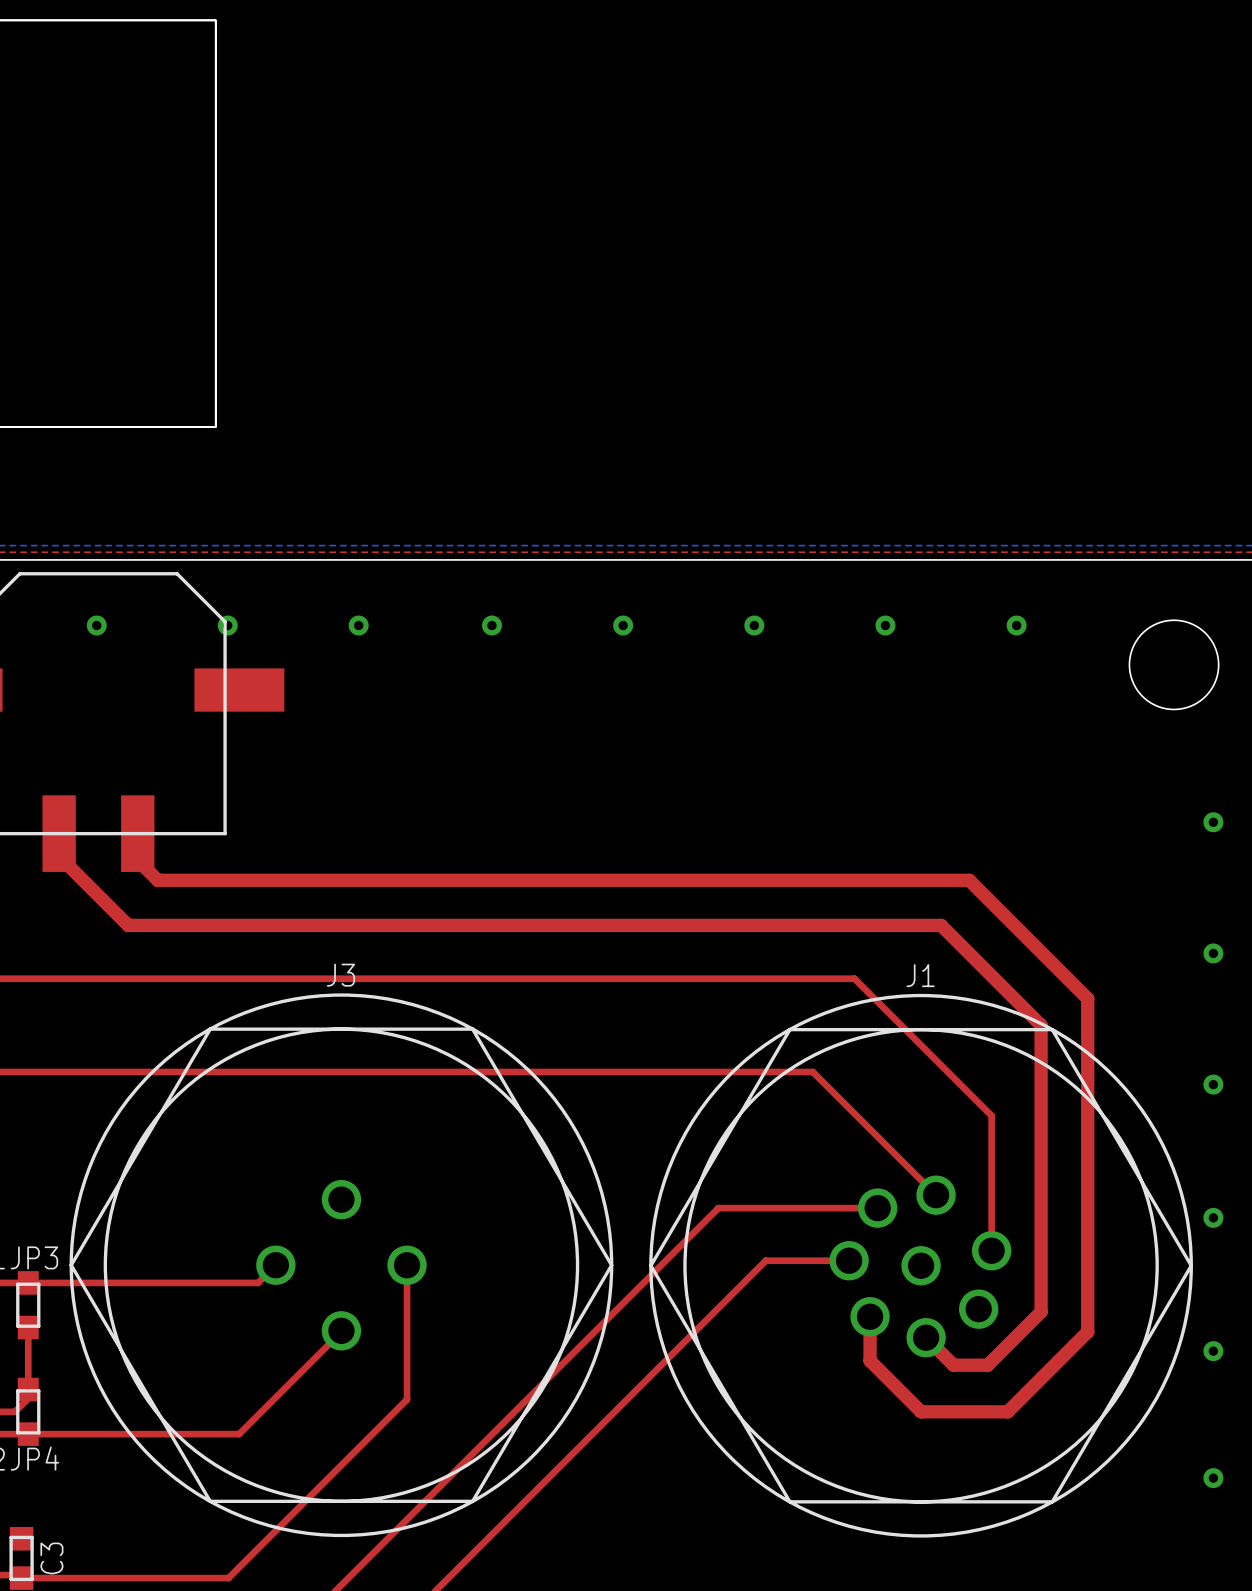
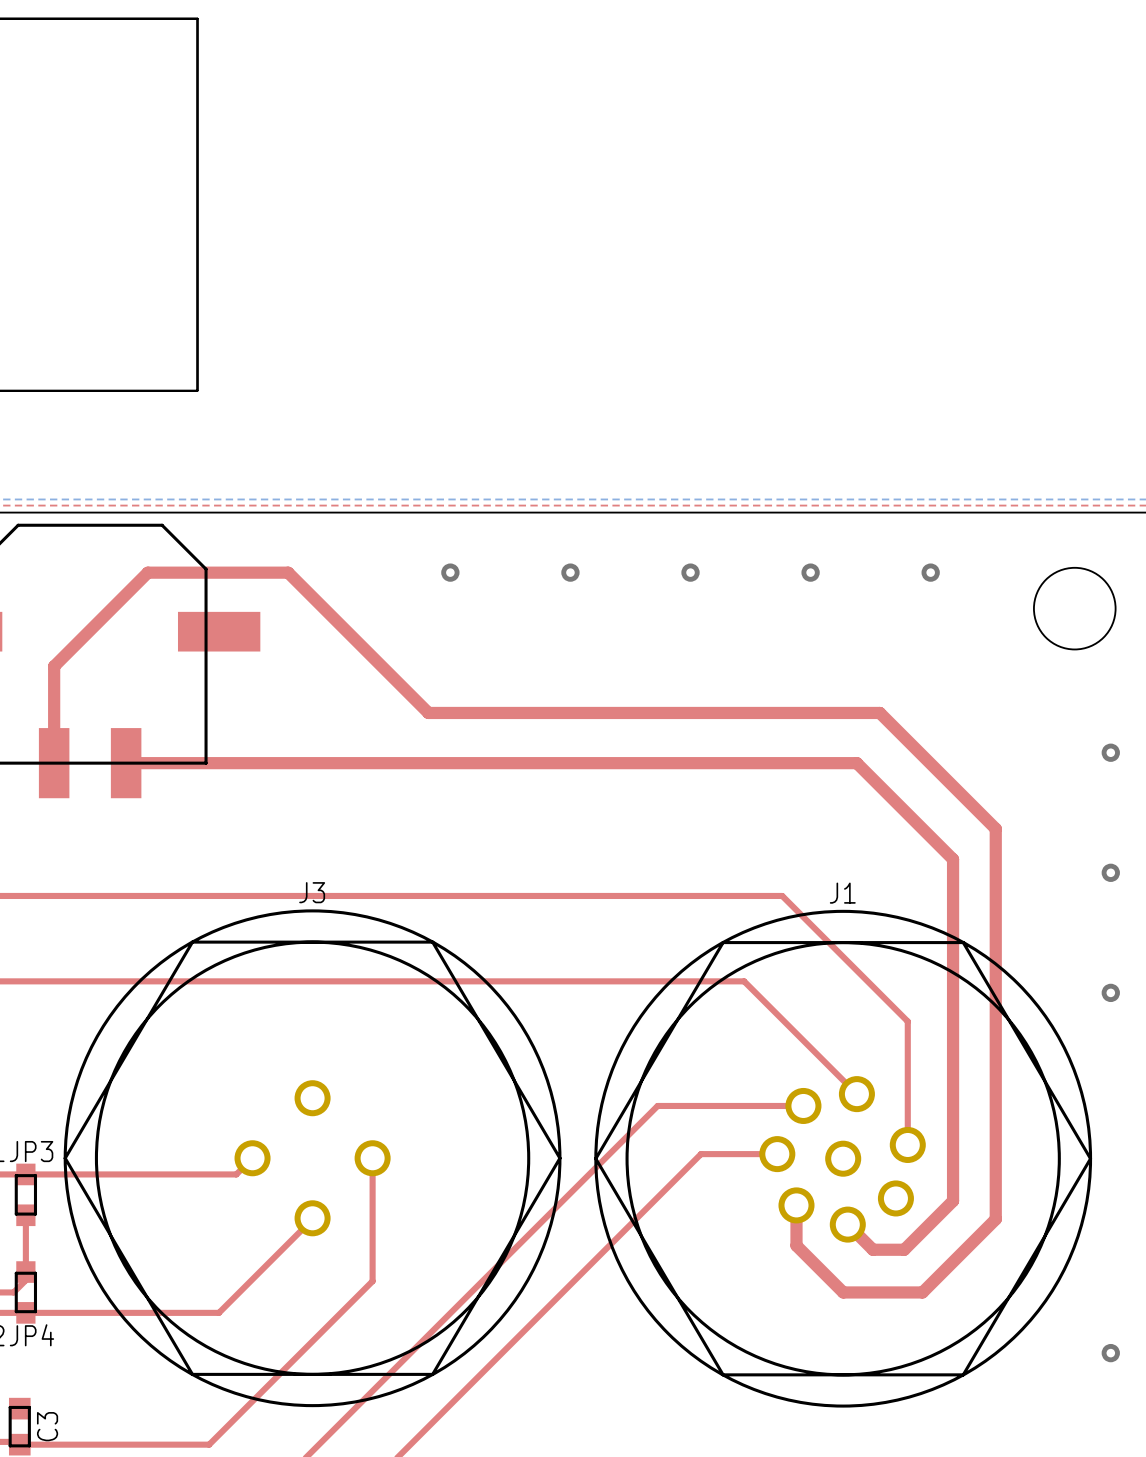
via: (96, 625) -> none
via: (227, 625) -> none
via: (358, 625) -> none
top track: (59, 833) (59, 856) (128, 925) (941, 925) (1041, 1025) -> (54, 763) (54, 666) (147, 572) (288, 572) (428, 712) (879, 712) (995, 828) (995, 914)
top track: (137, 833) (137, 860) (157, 880) (969, 880) (1087, 998) -> (126, 763) (856, 763) (953, 859) (953, 938)
via: (1213, 1217) -> none
via: (1213, 1351) -> none

